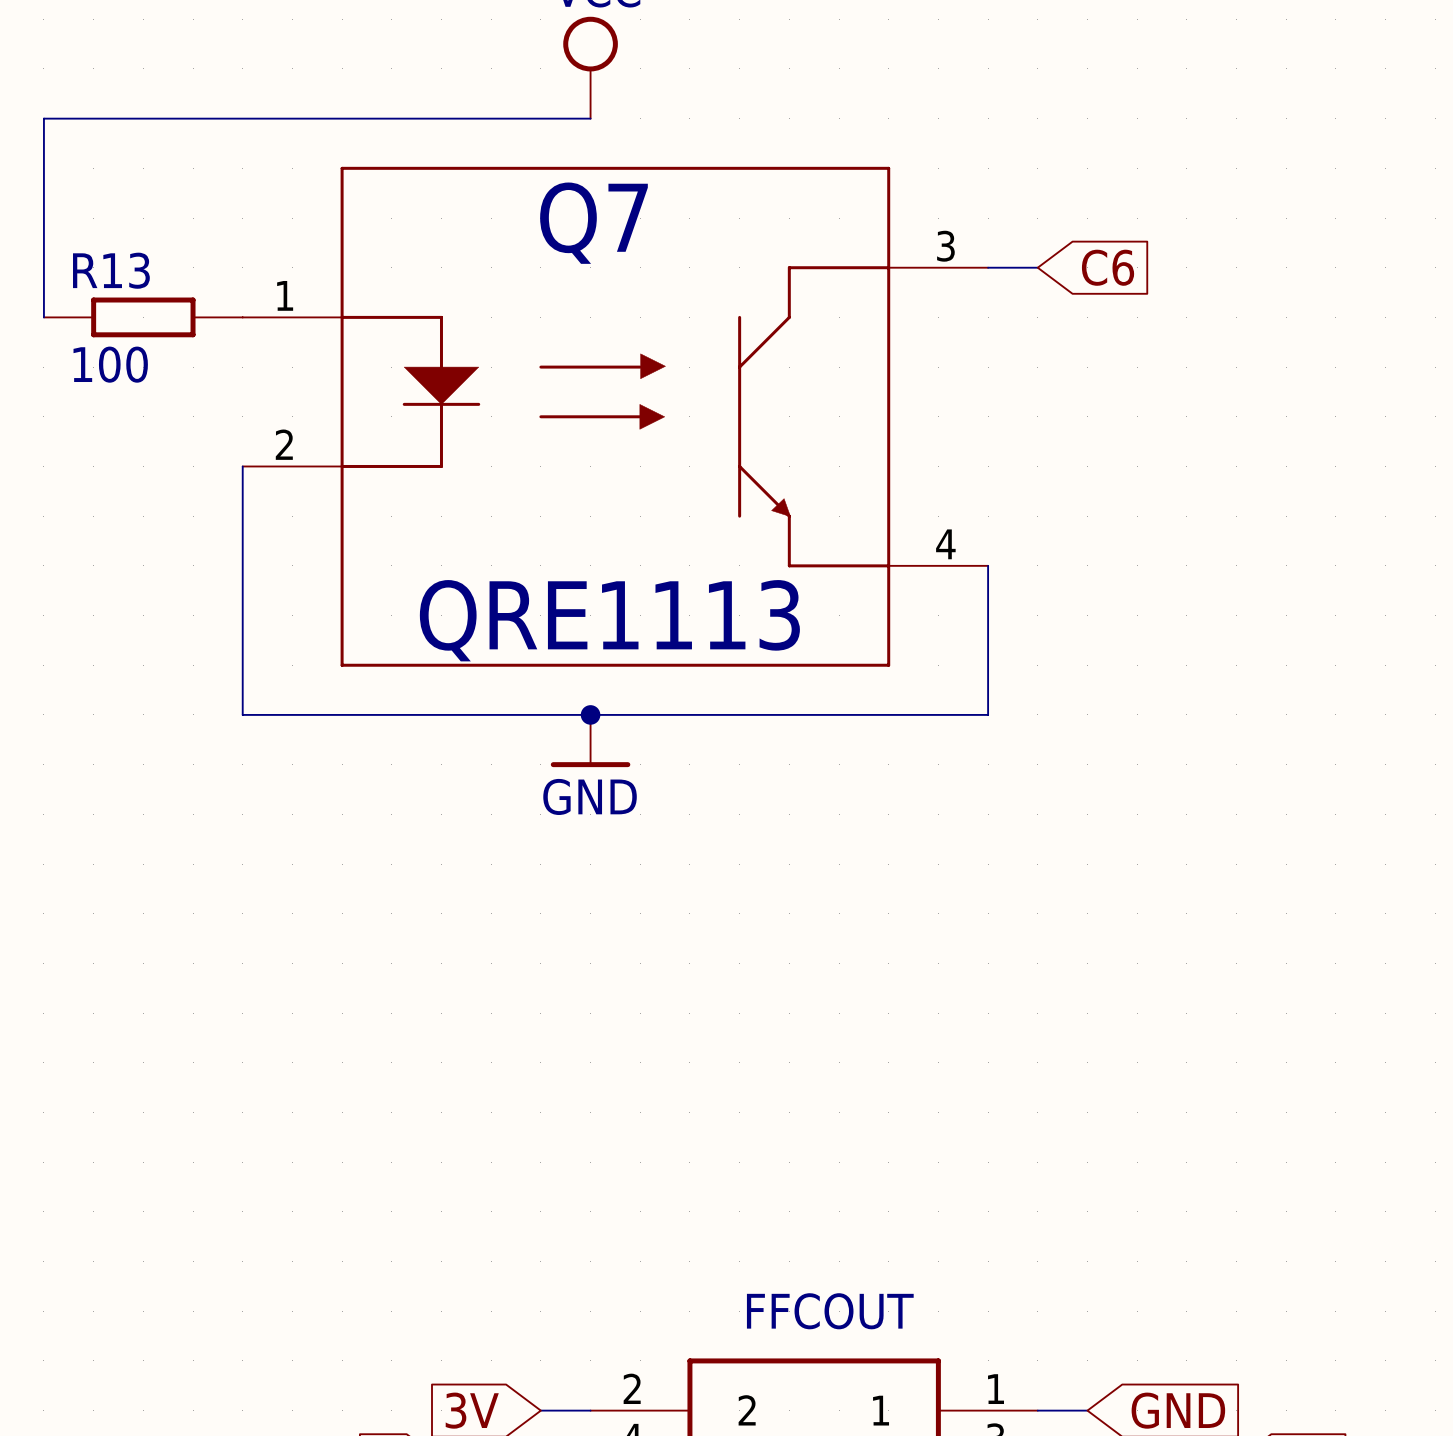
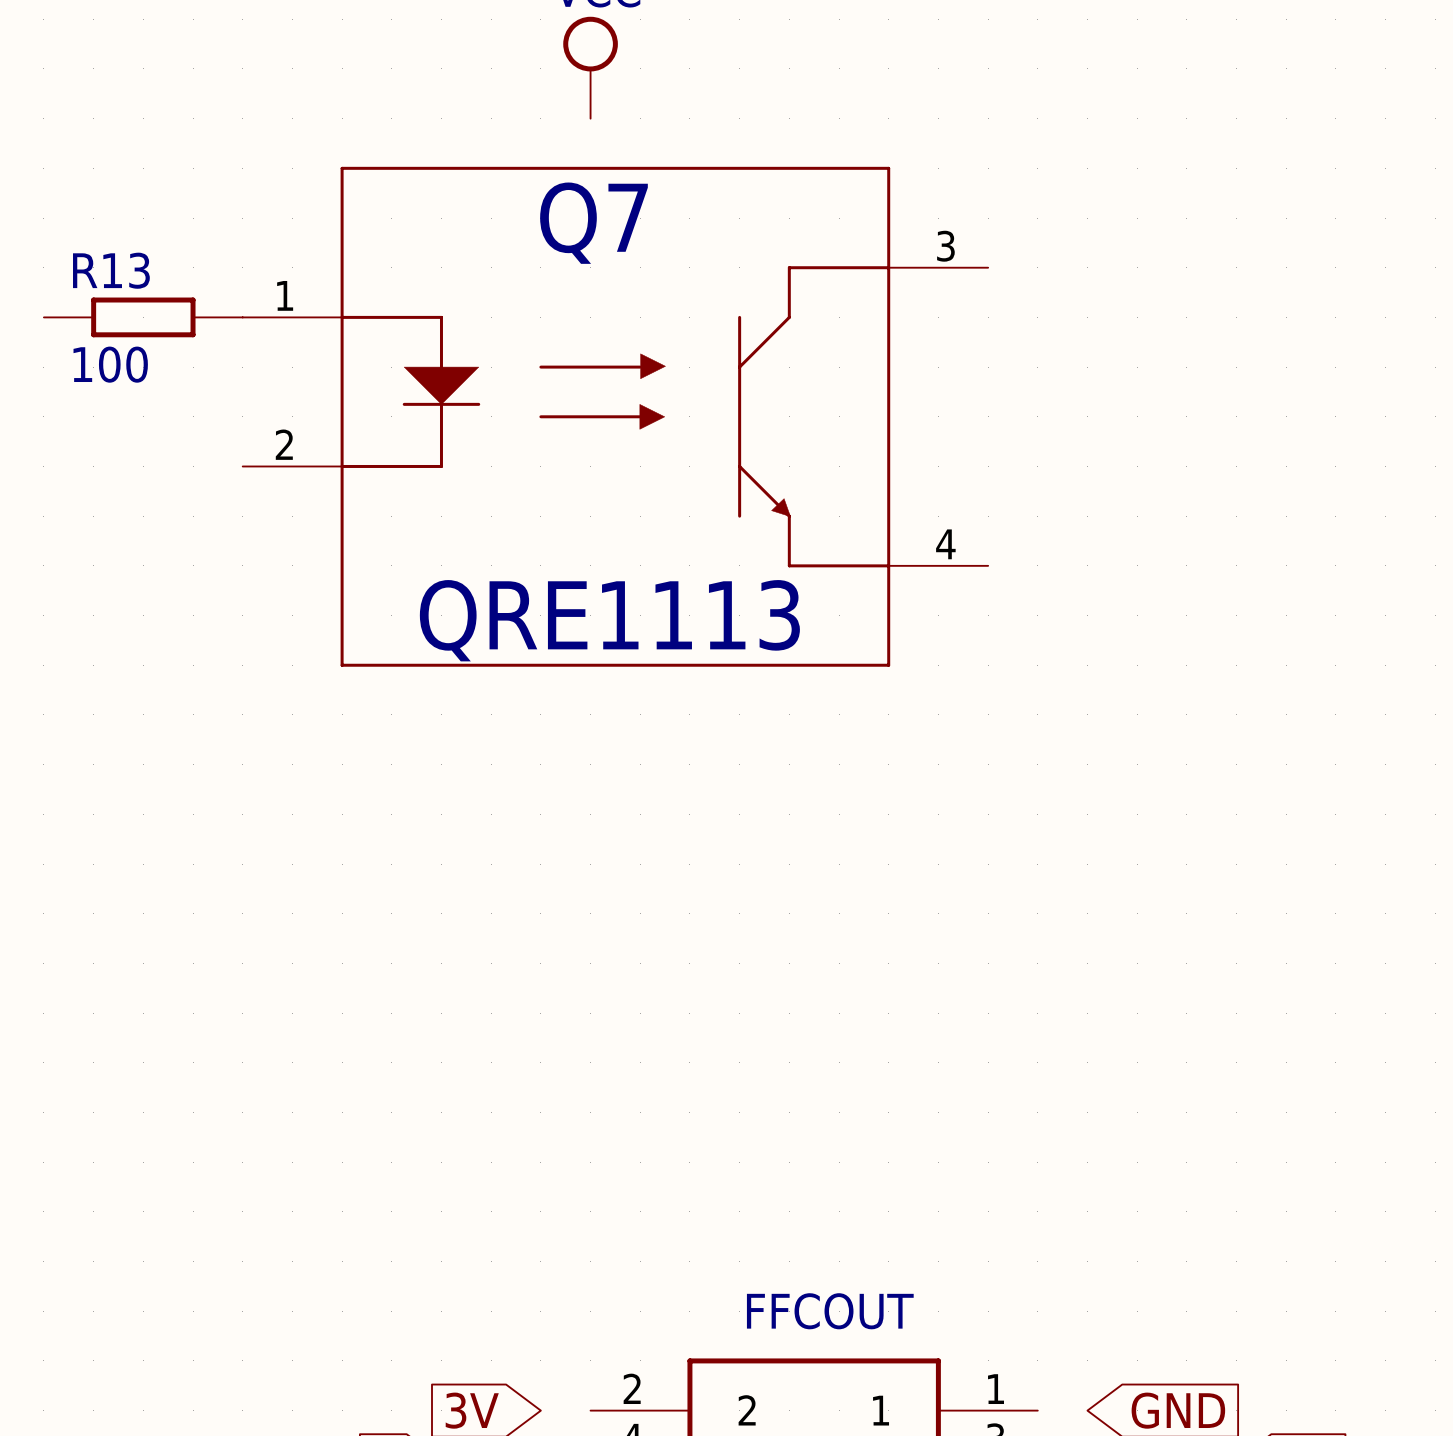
wire: (590, 118) (43, 118) (43, 317) -> none
wire: (988, 267) (1037, 267) -> none
global label: C6 (1108, 267) -> none
wire: (242, 466) (242, 714) (988, 714) (988, 565) -> none
junction: (590, 714) -> none
power symbol: GND (590, 741) -> none
wire: (540, 1410) (590, 1410) -> none
wire: (1037, 1410) (1087, 1410) -> none

